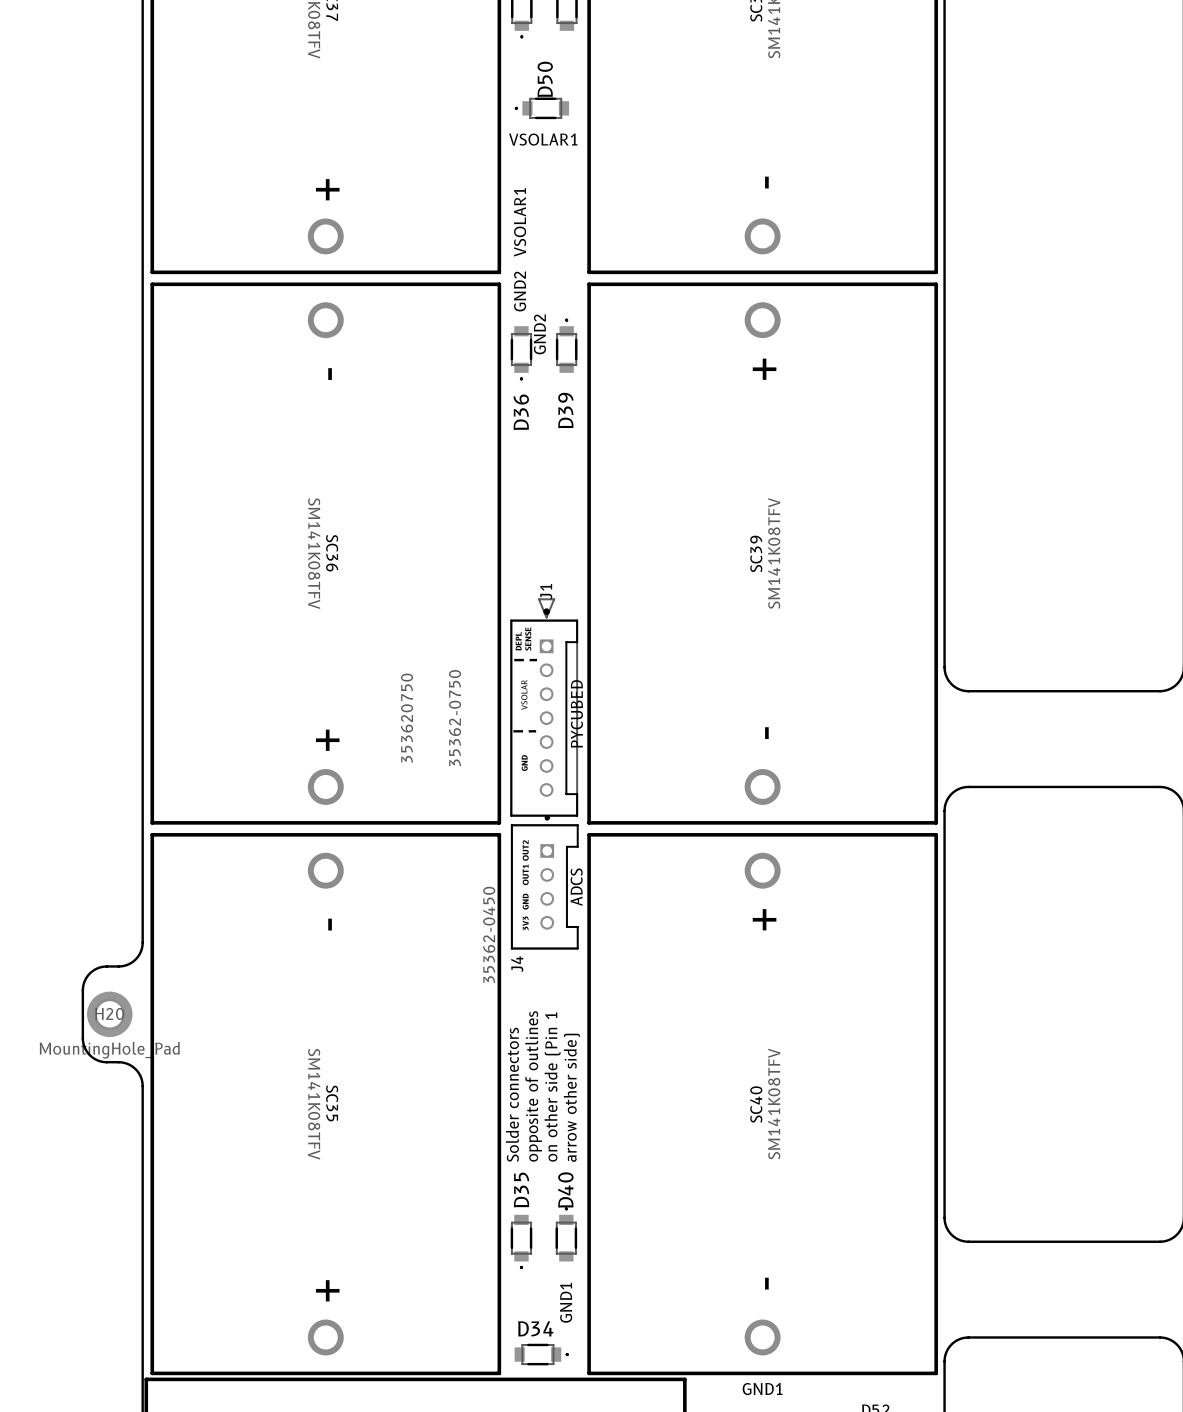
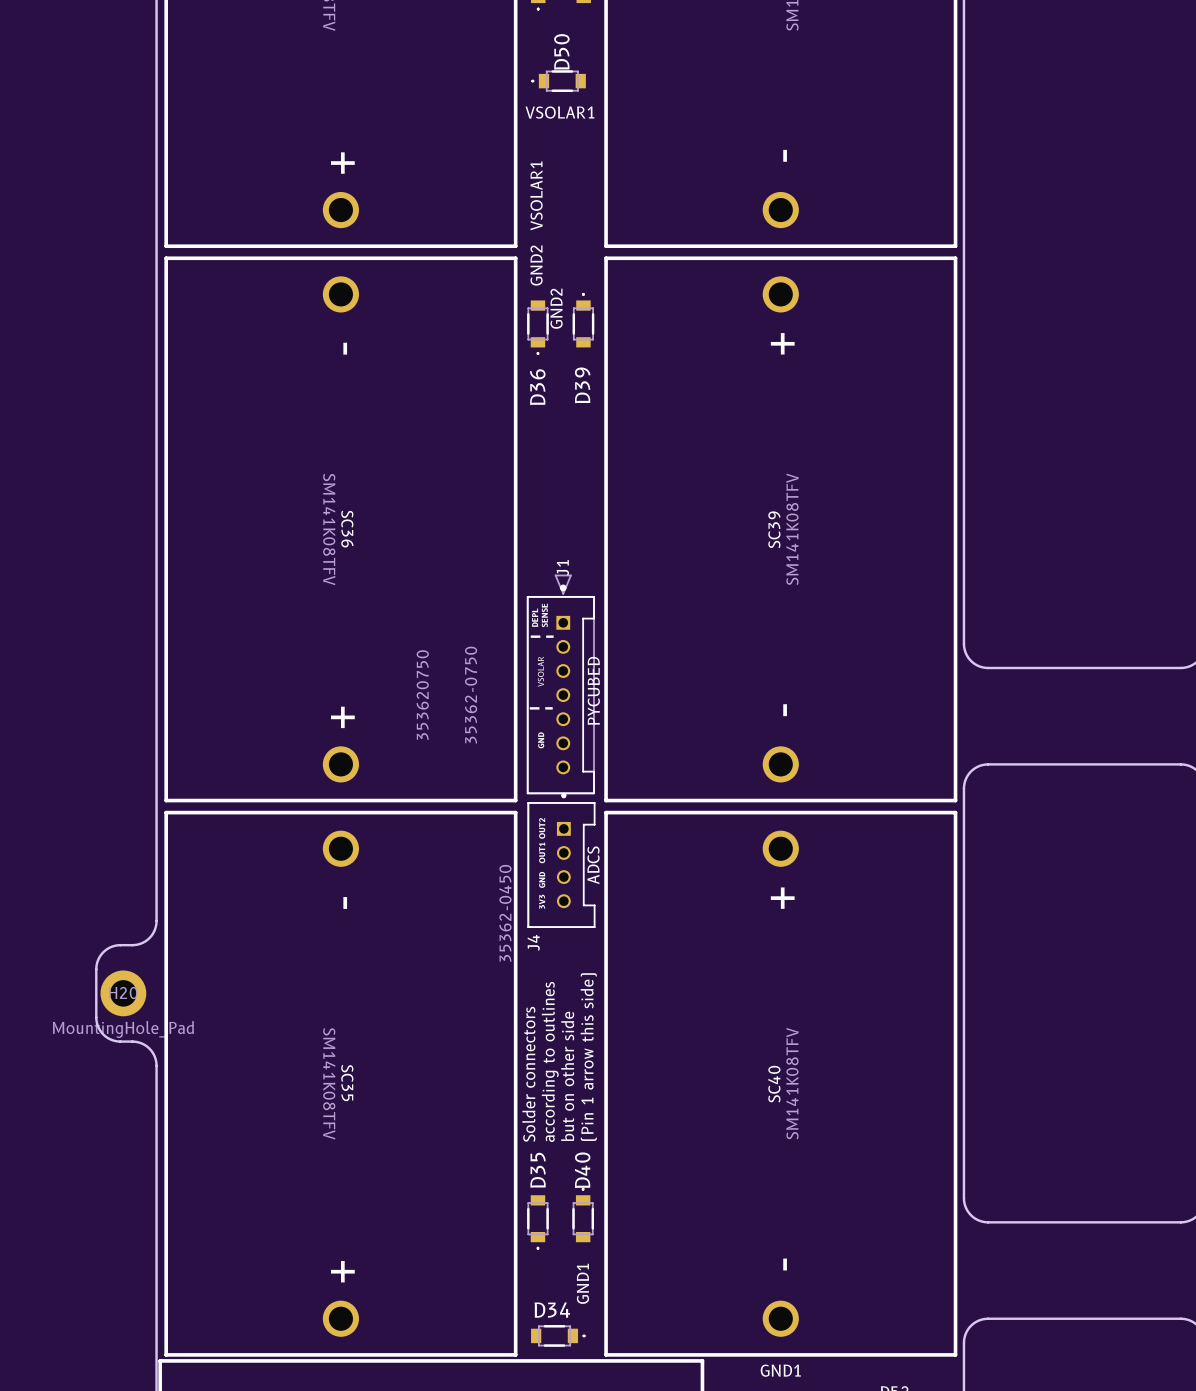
text: opposite of outlines (533, 1086) -> according to outlines (550, 1061)
text: on other side (Pin 1 (552, 1087) -> but on other side (567, 1076)
text: arrow other side) (571, 1097) -> (Pin 1 arrow this side) (588, 1057)

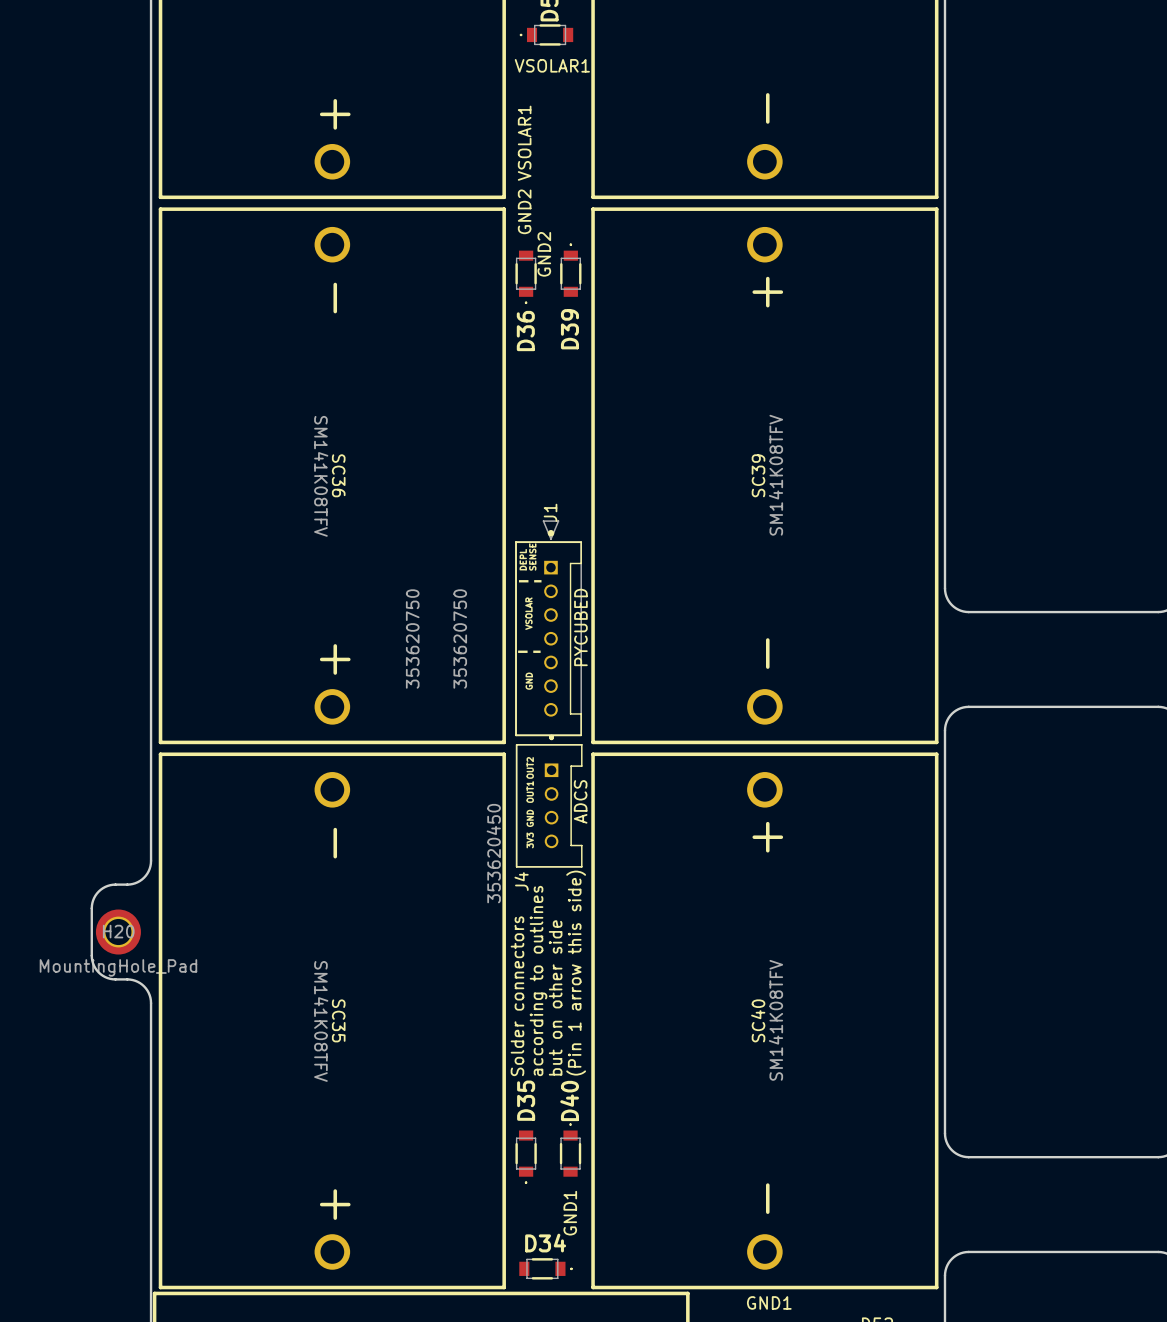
J1 value: 35362-0750 (471, 695) -> 353620750 (460, 639)
J4 value: 35362-0450 (505, 913) -> 353620450 (493, 853)

